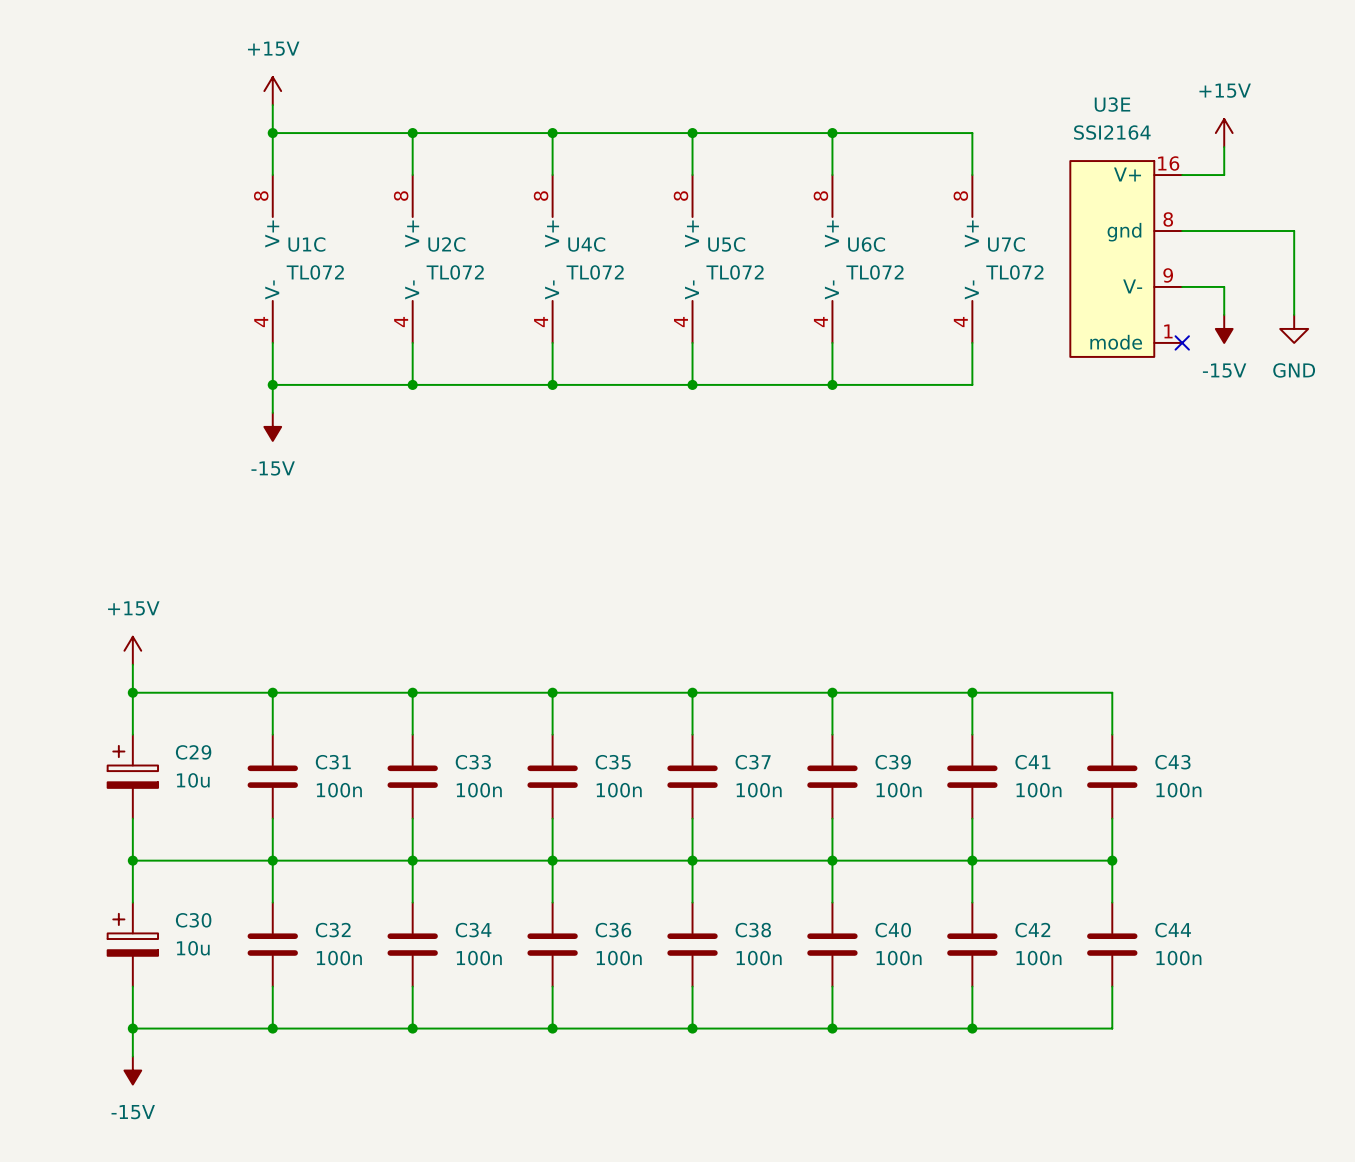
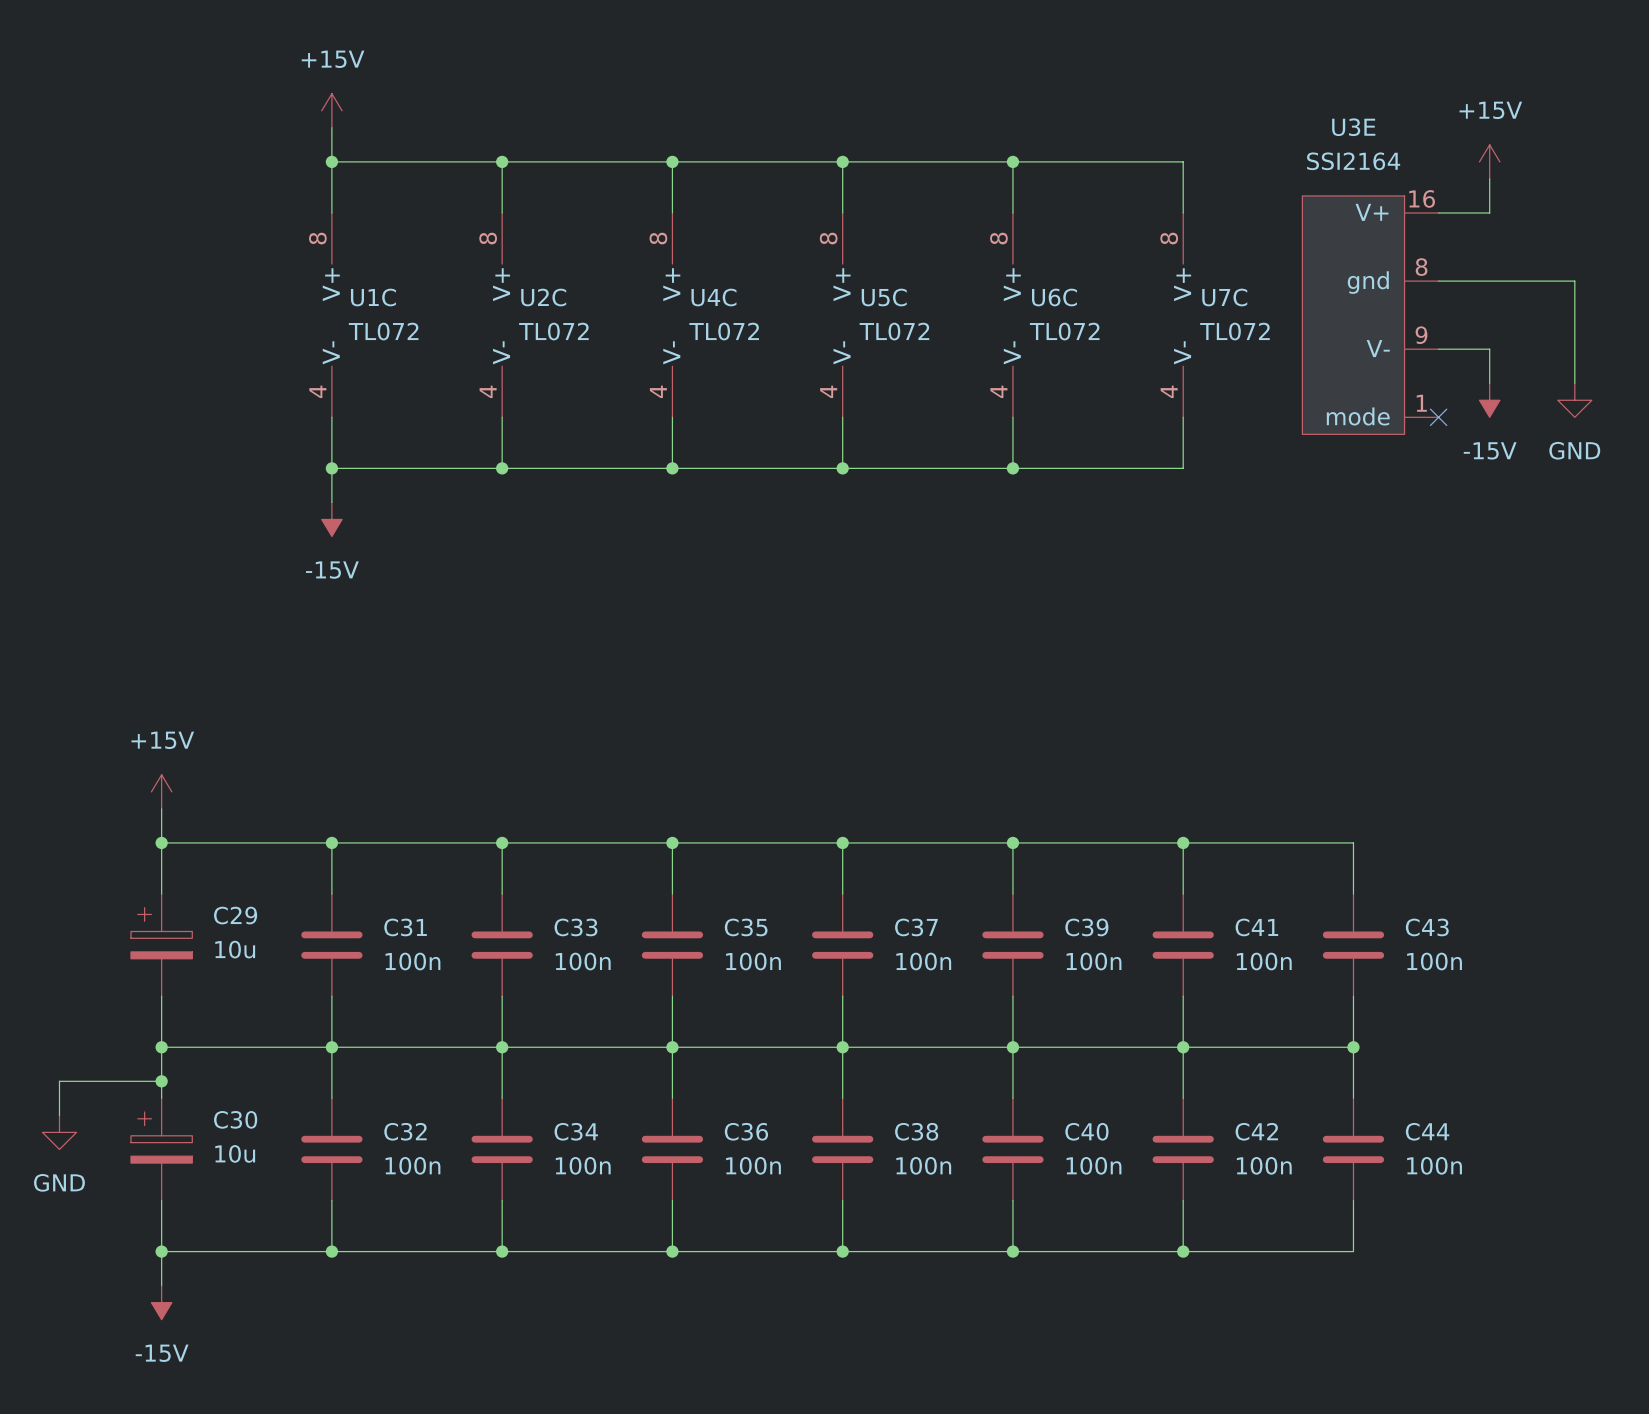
wire: none -> (161, 1081) (59, 1081) (59, 1115)
junction: none -> (161, 1081)
power symbol: none -> GND (59, 1132)

